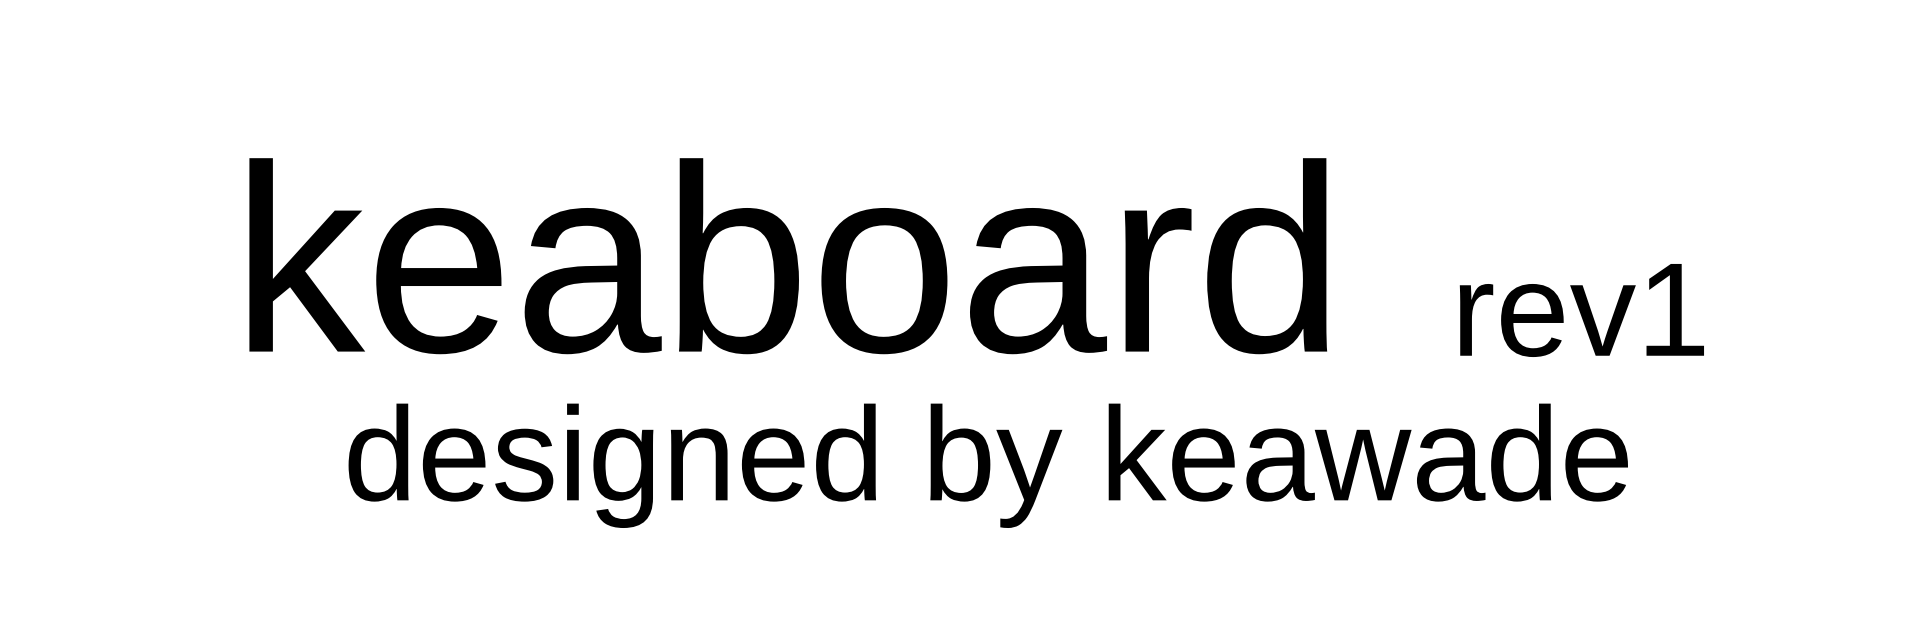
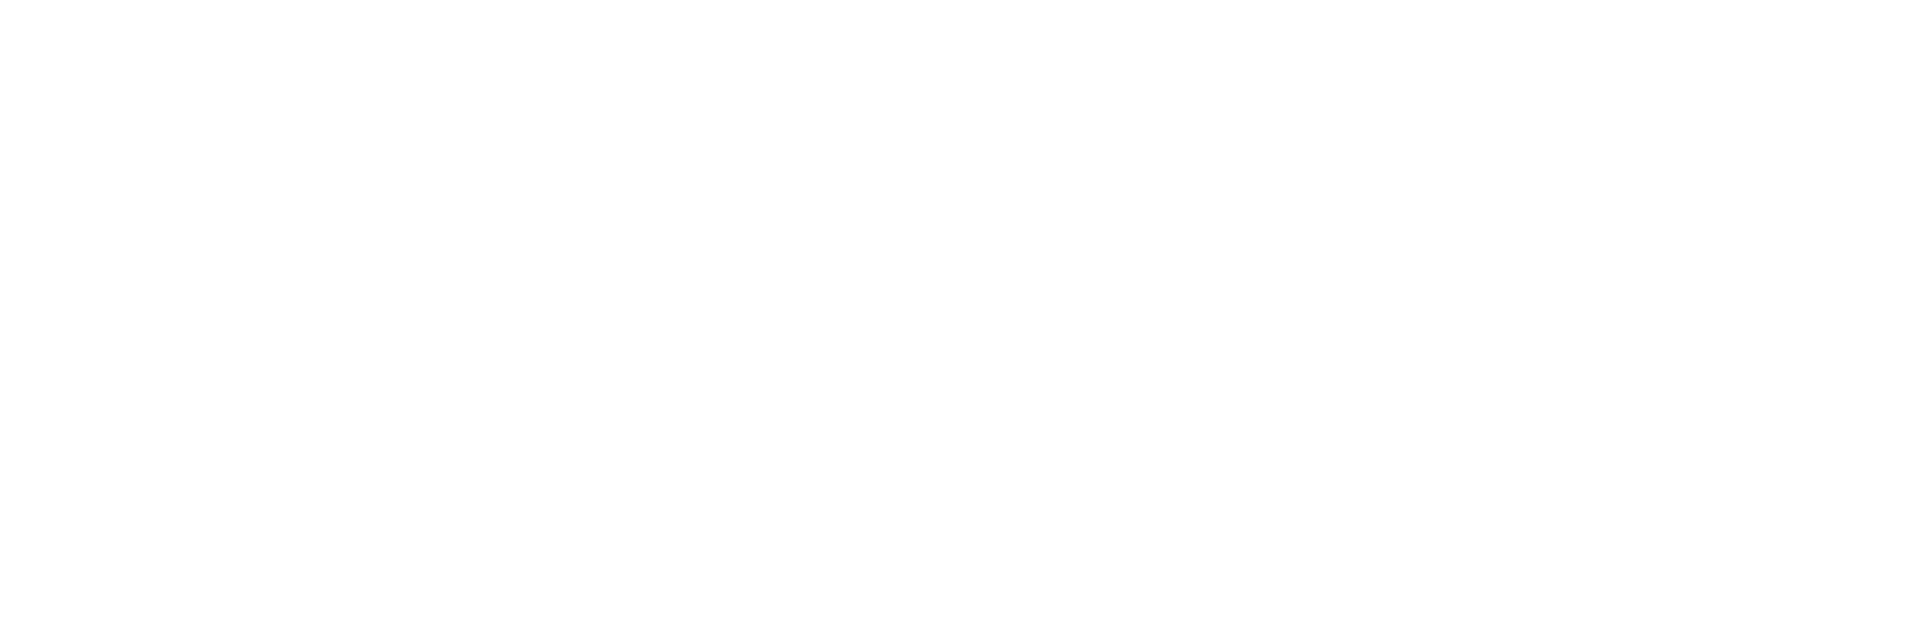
text: keaboard (788, 256) -> none
text: rev1 (1581, 310) -> none
text: designed by keawade (988, 465) -> none

